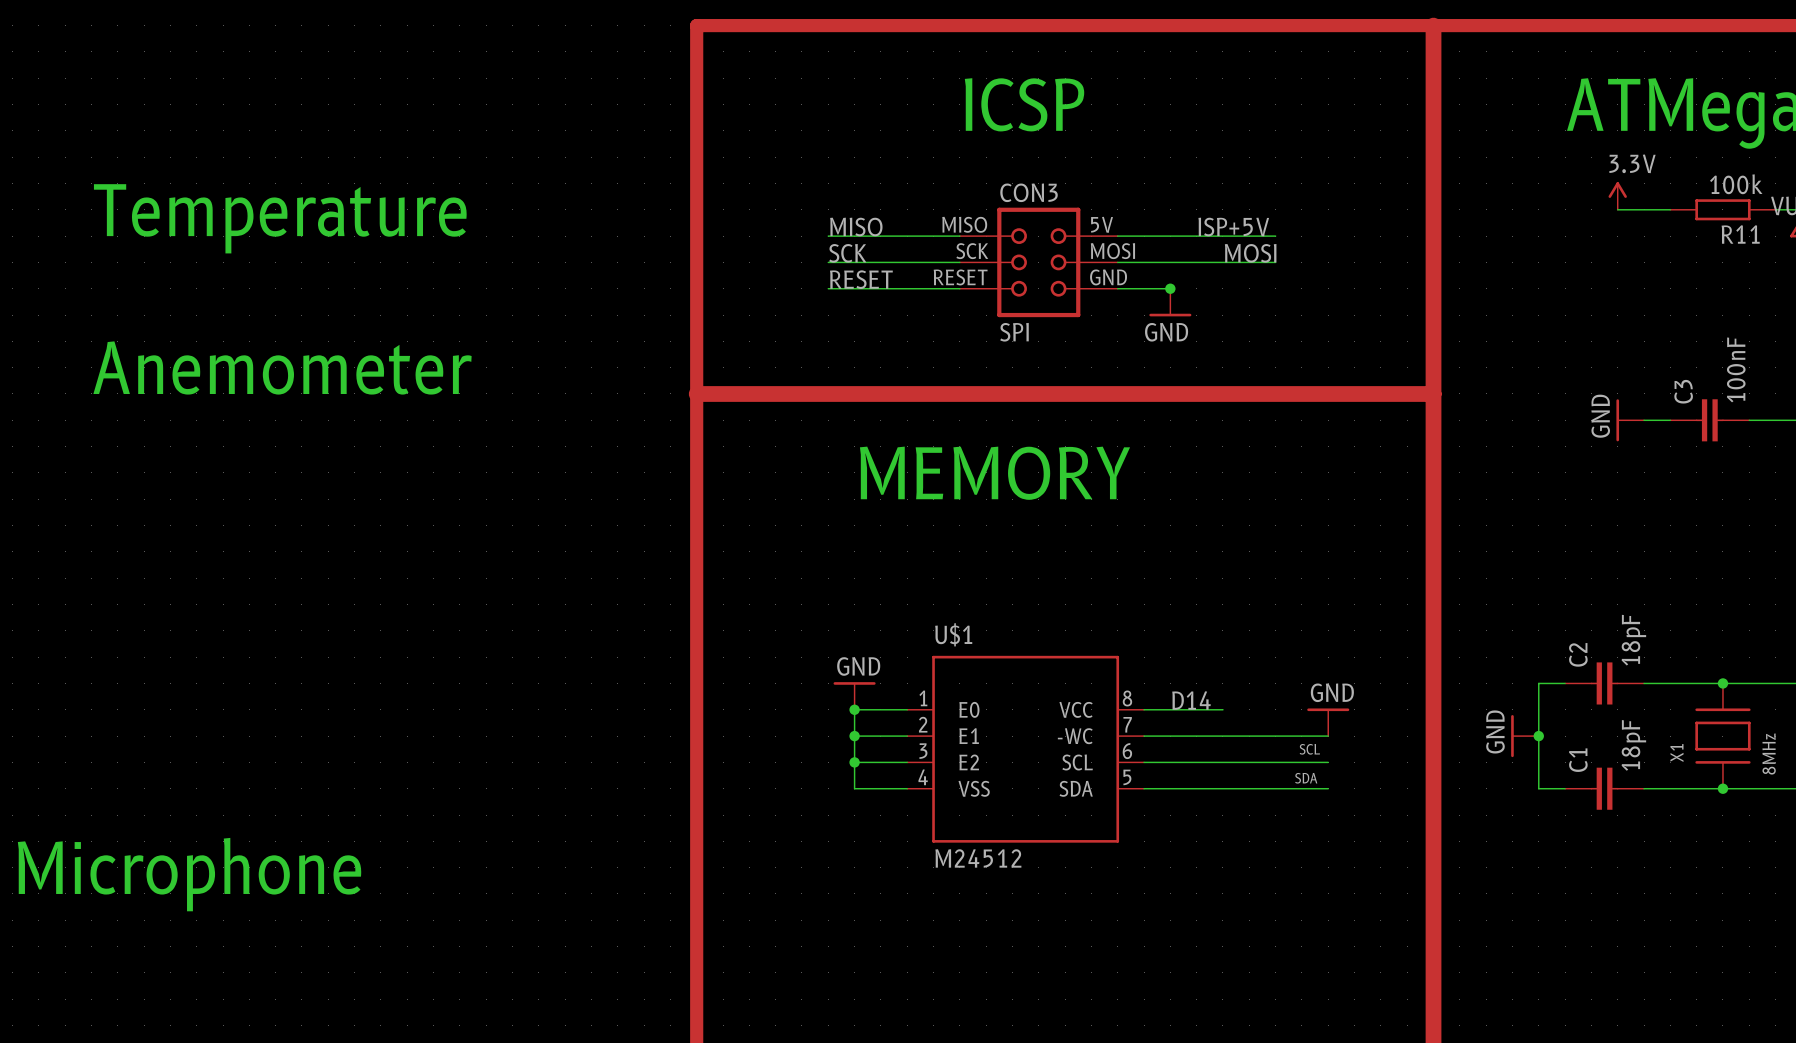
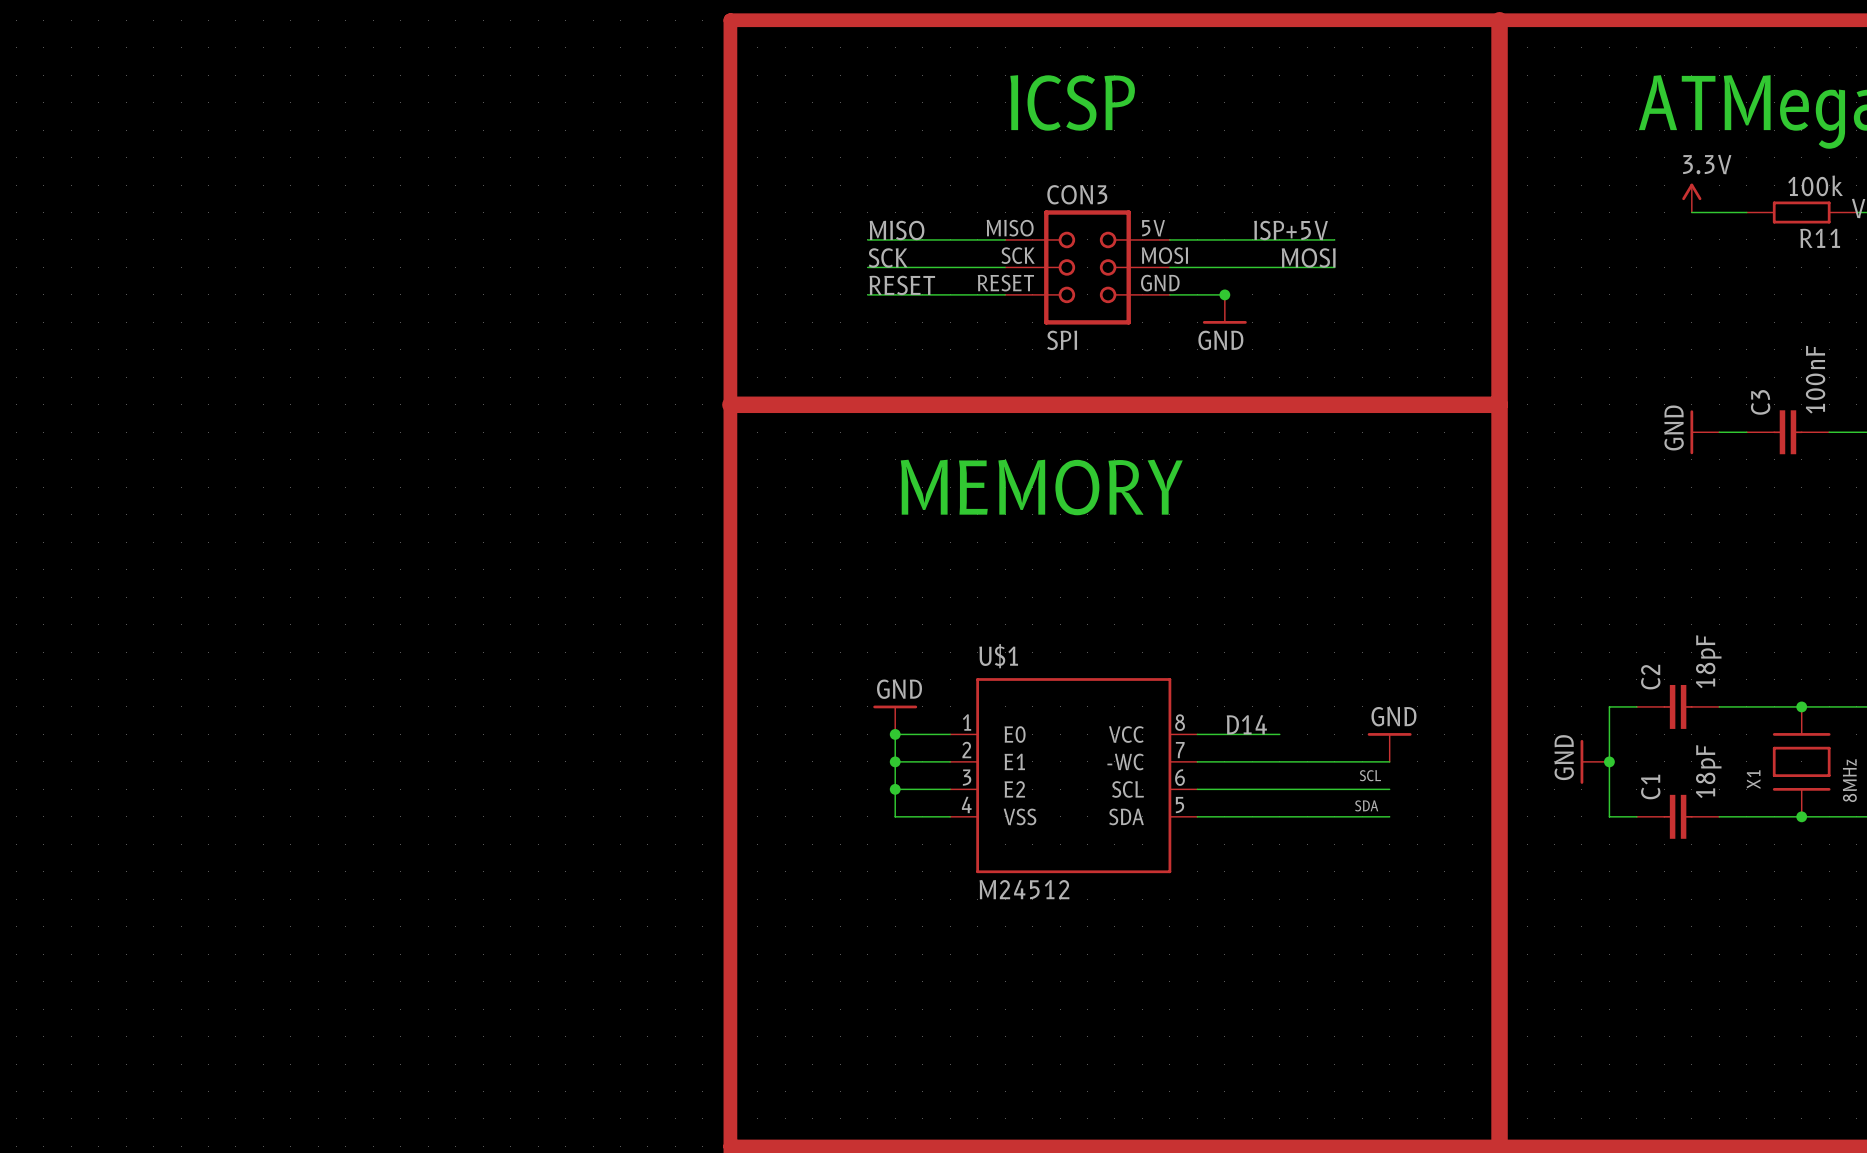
text: Temperature (280, 218) -> none
text: Anemometer (282, 367) -> none
text: Microphone (189, 874) -> none

